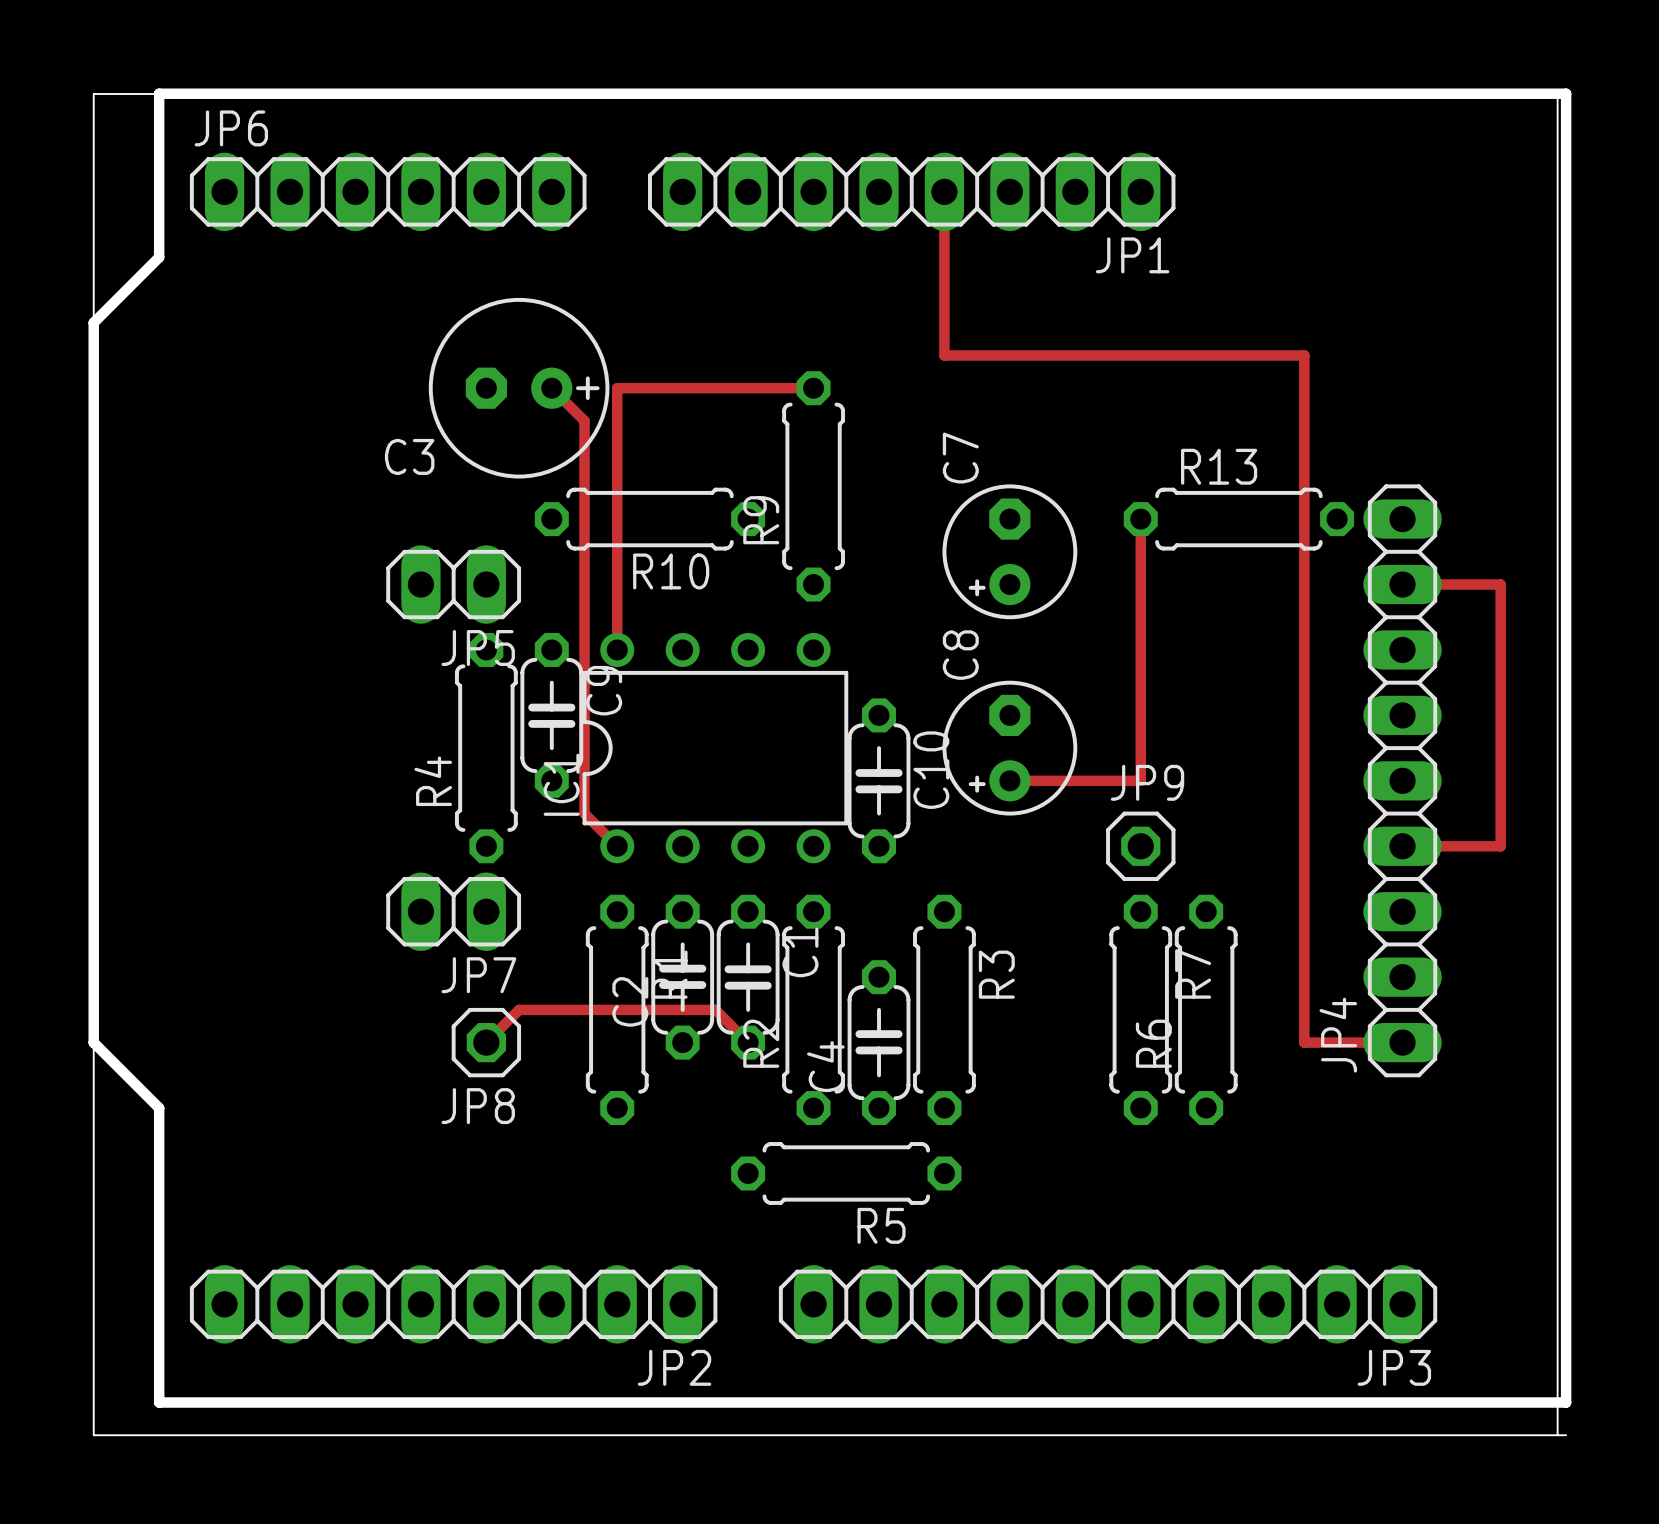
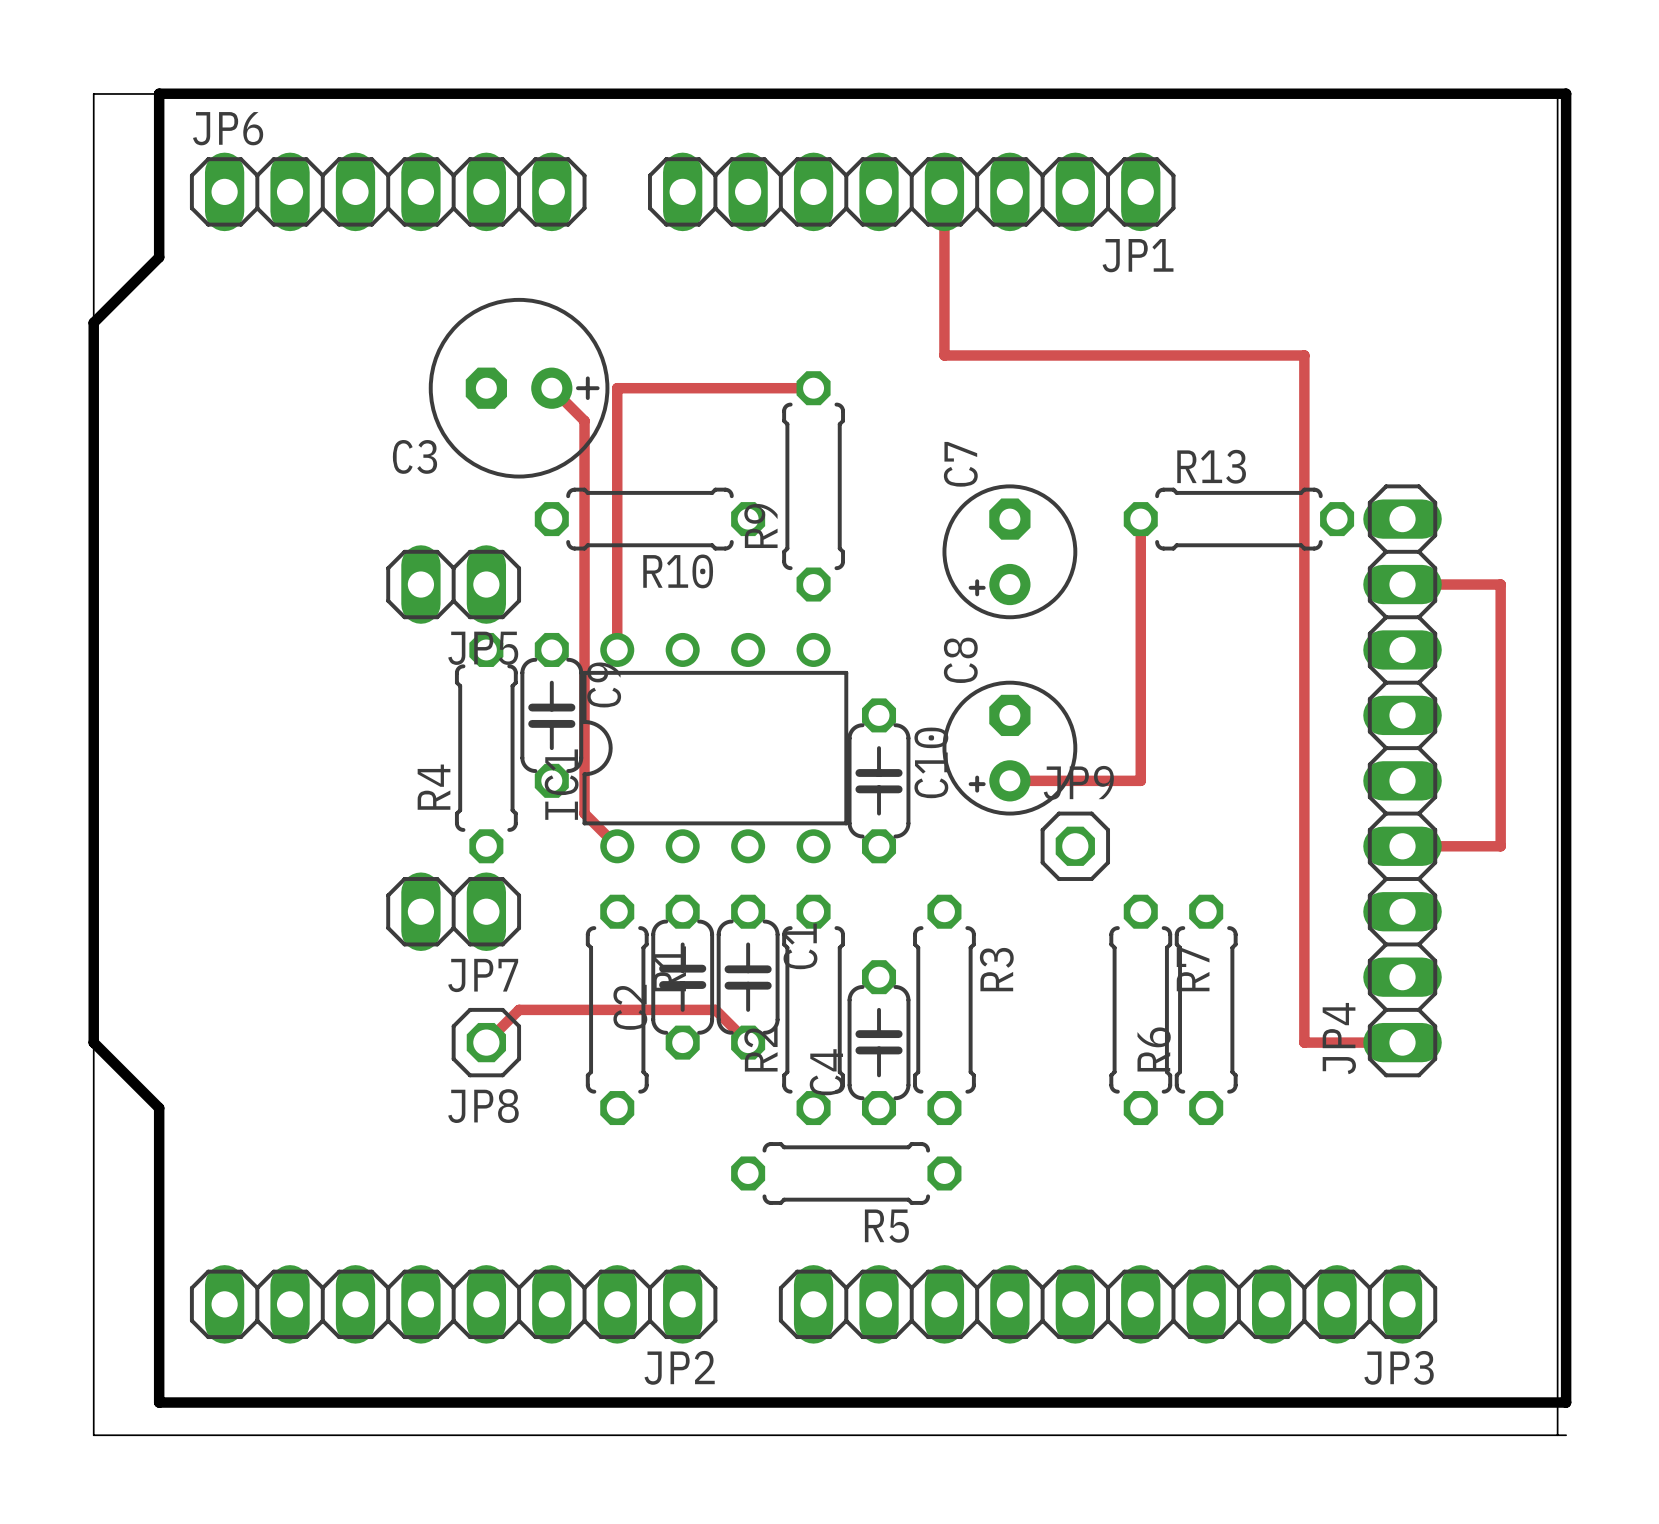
JP9 position: (1140, 846) -> (1075, 846)

